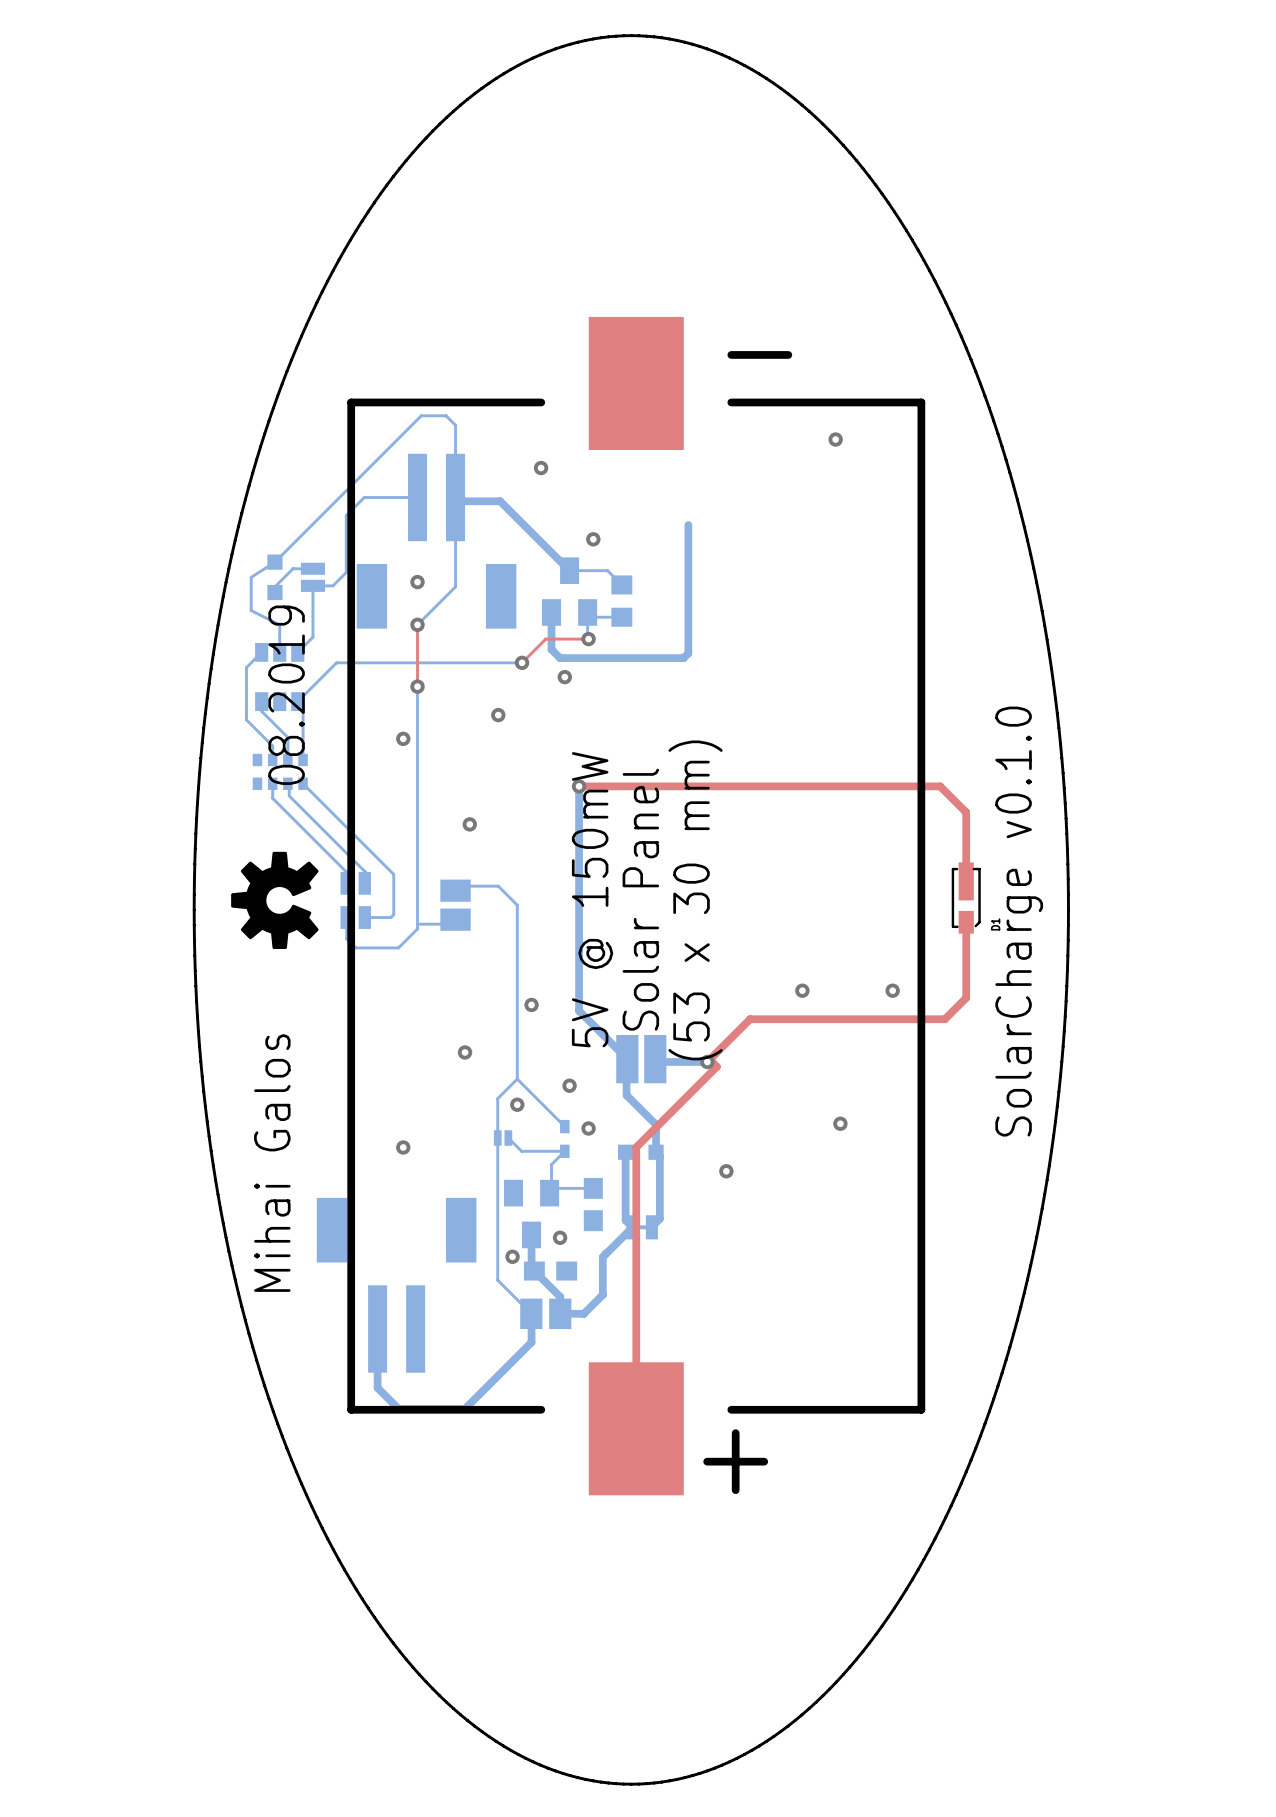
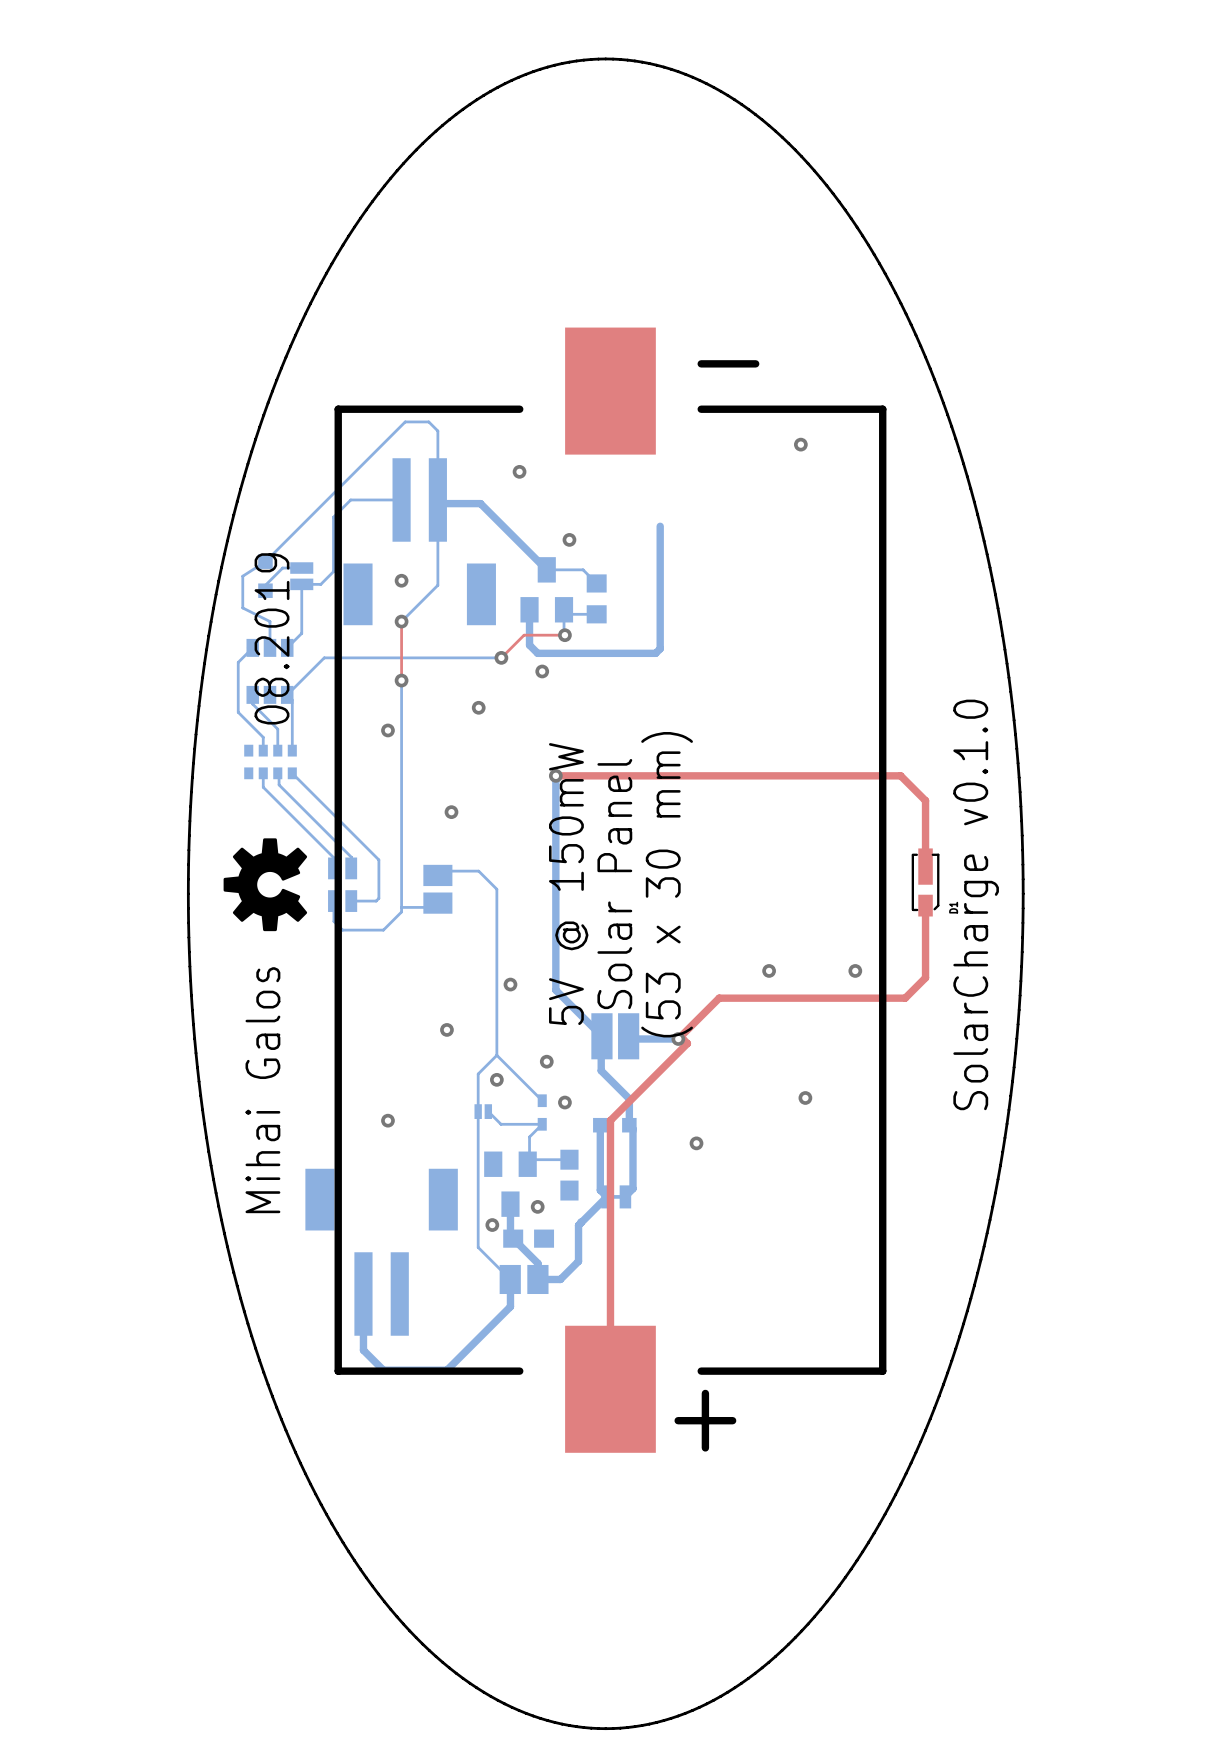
text position: 08.2019 (286, 695) -> 08.2019 (272, 638)
text position: Mihai Galos (272, 1163) -> Mihai Galos (262, 1090)

